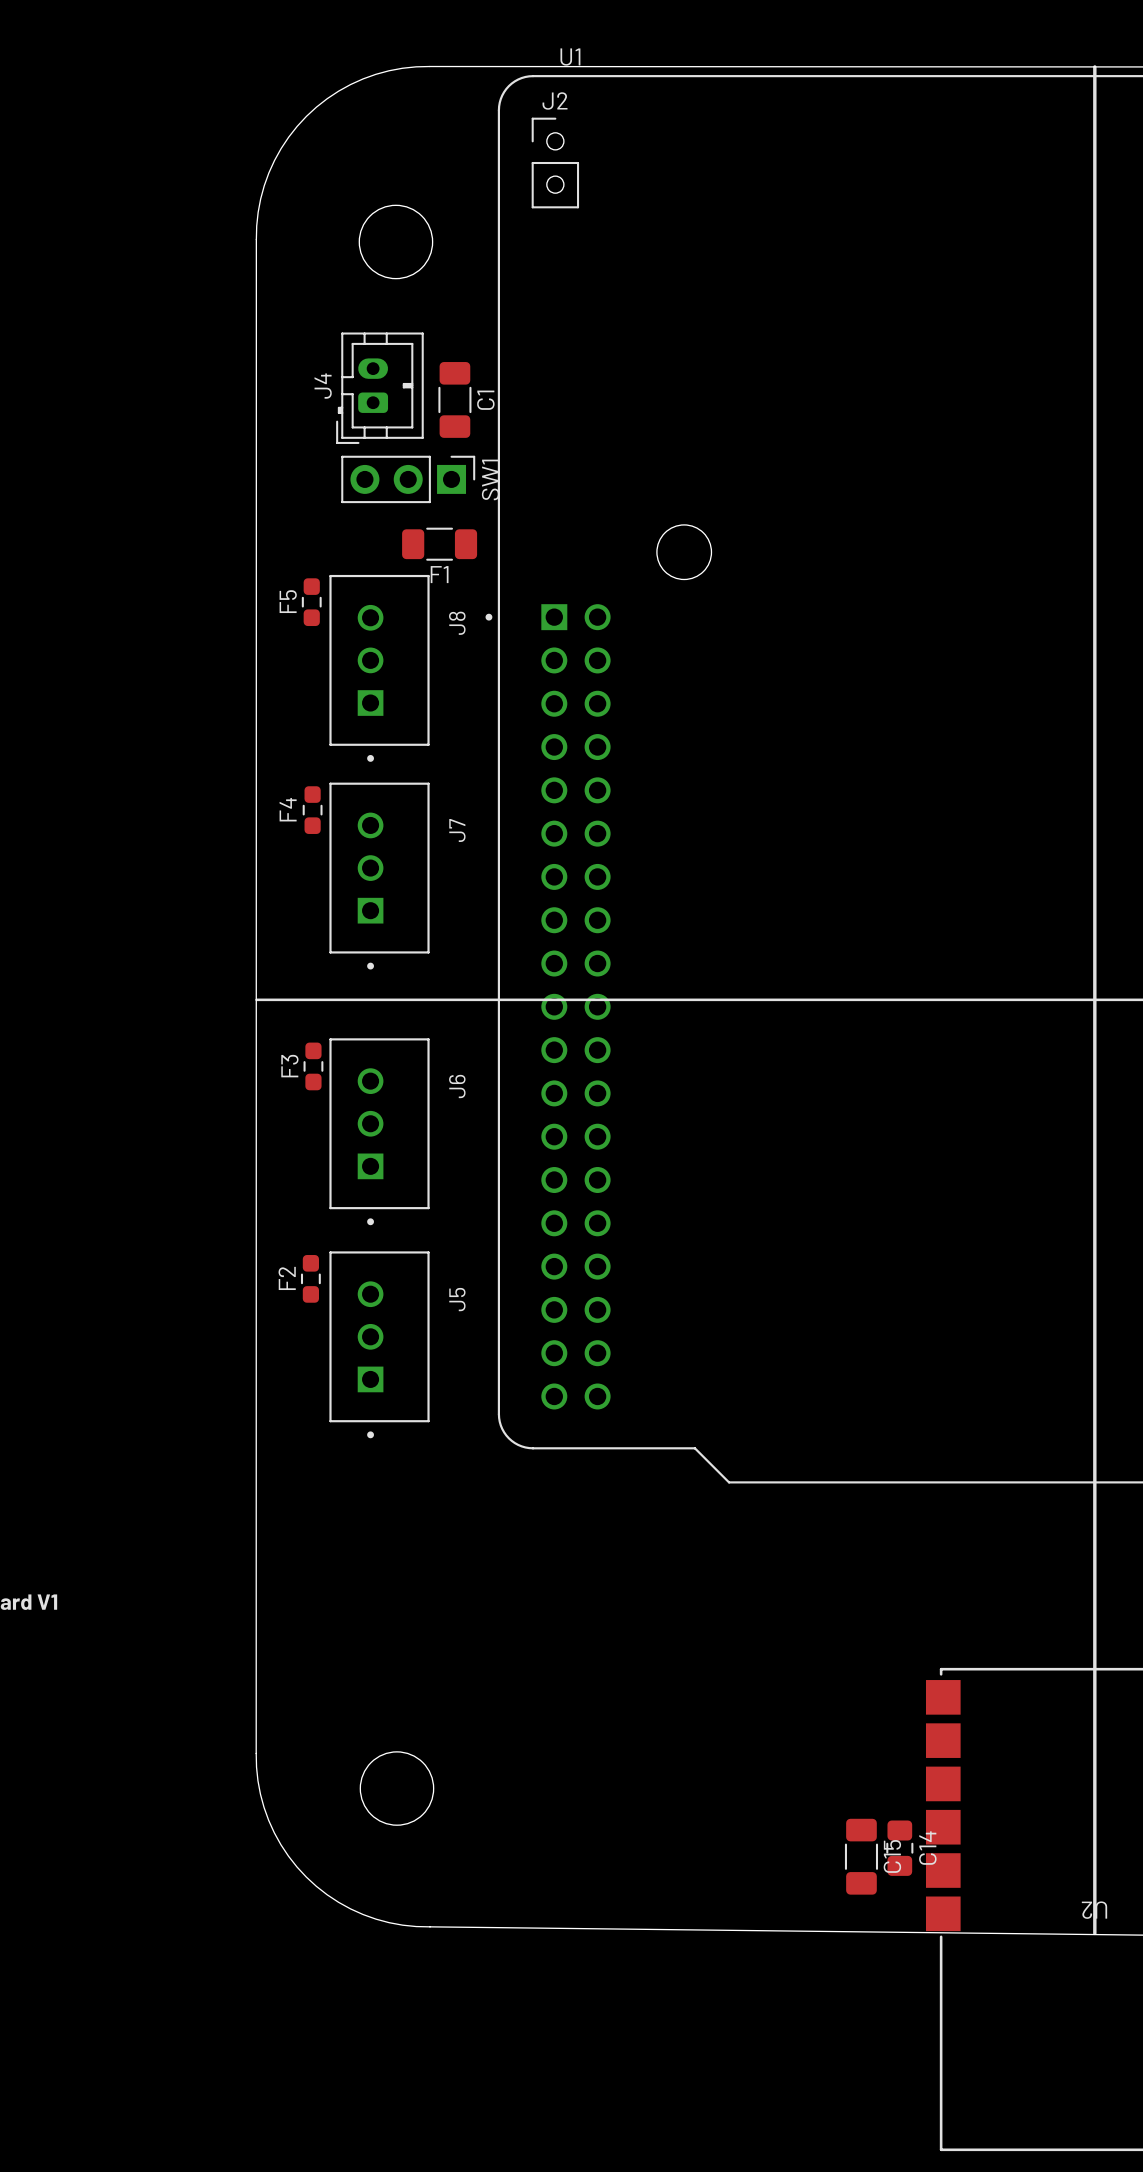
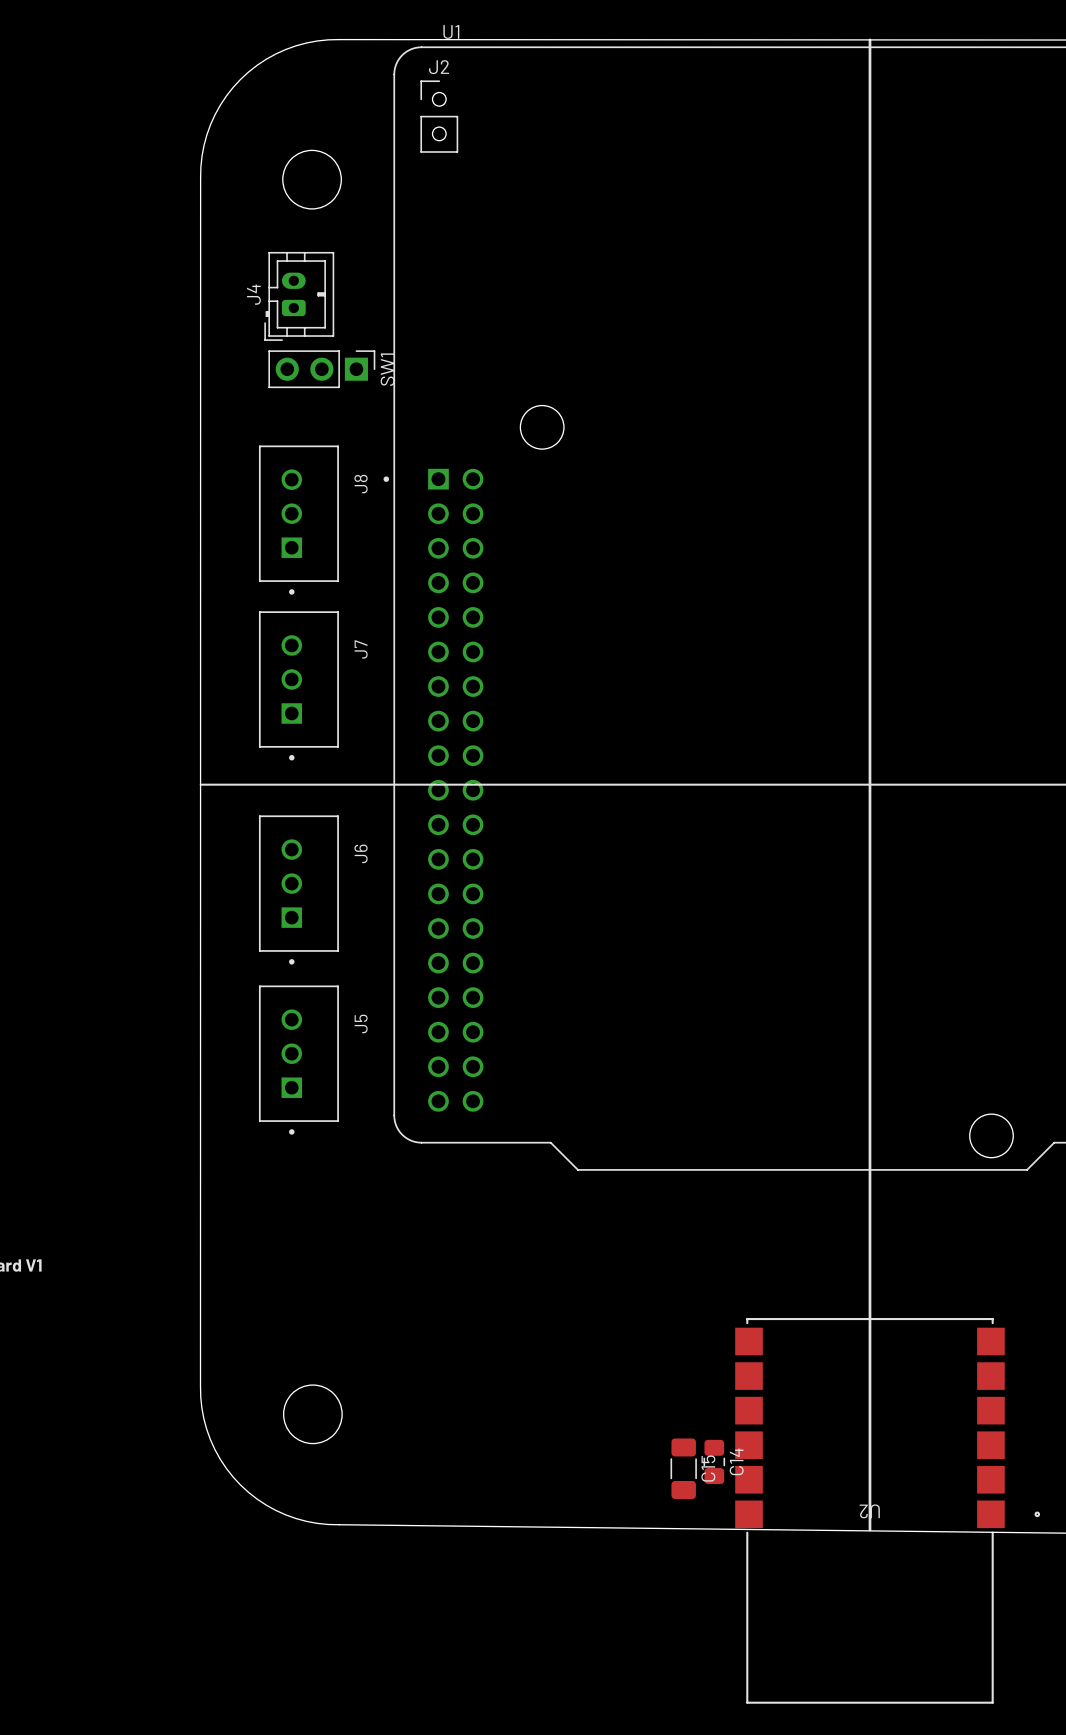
C1: (454, 399) -> none
F1: (439, 544) -> none
F5: (311, 602) -> none
F4: (312, 810) -> none
F3: (313, 1066) -> none
F2: (310, 1278) -> none

